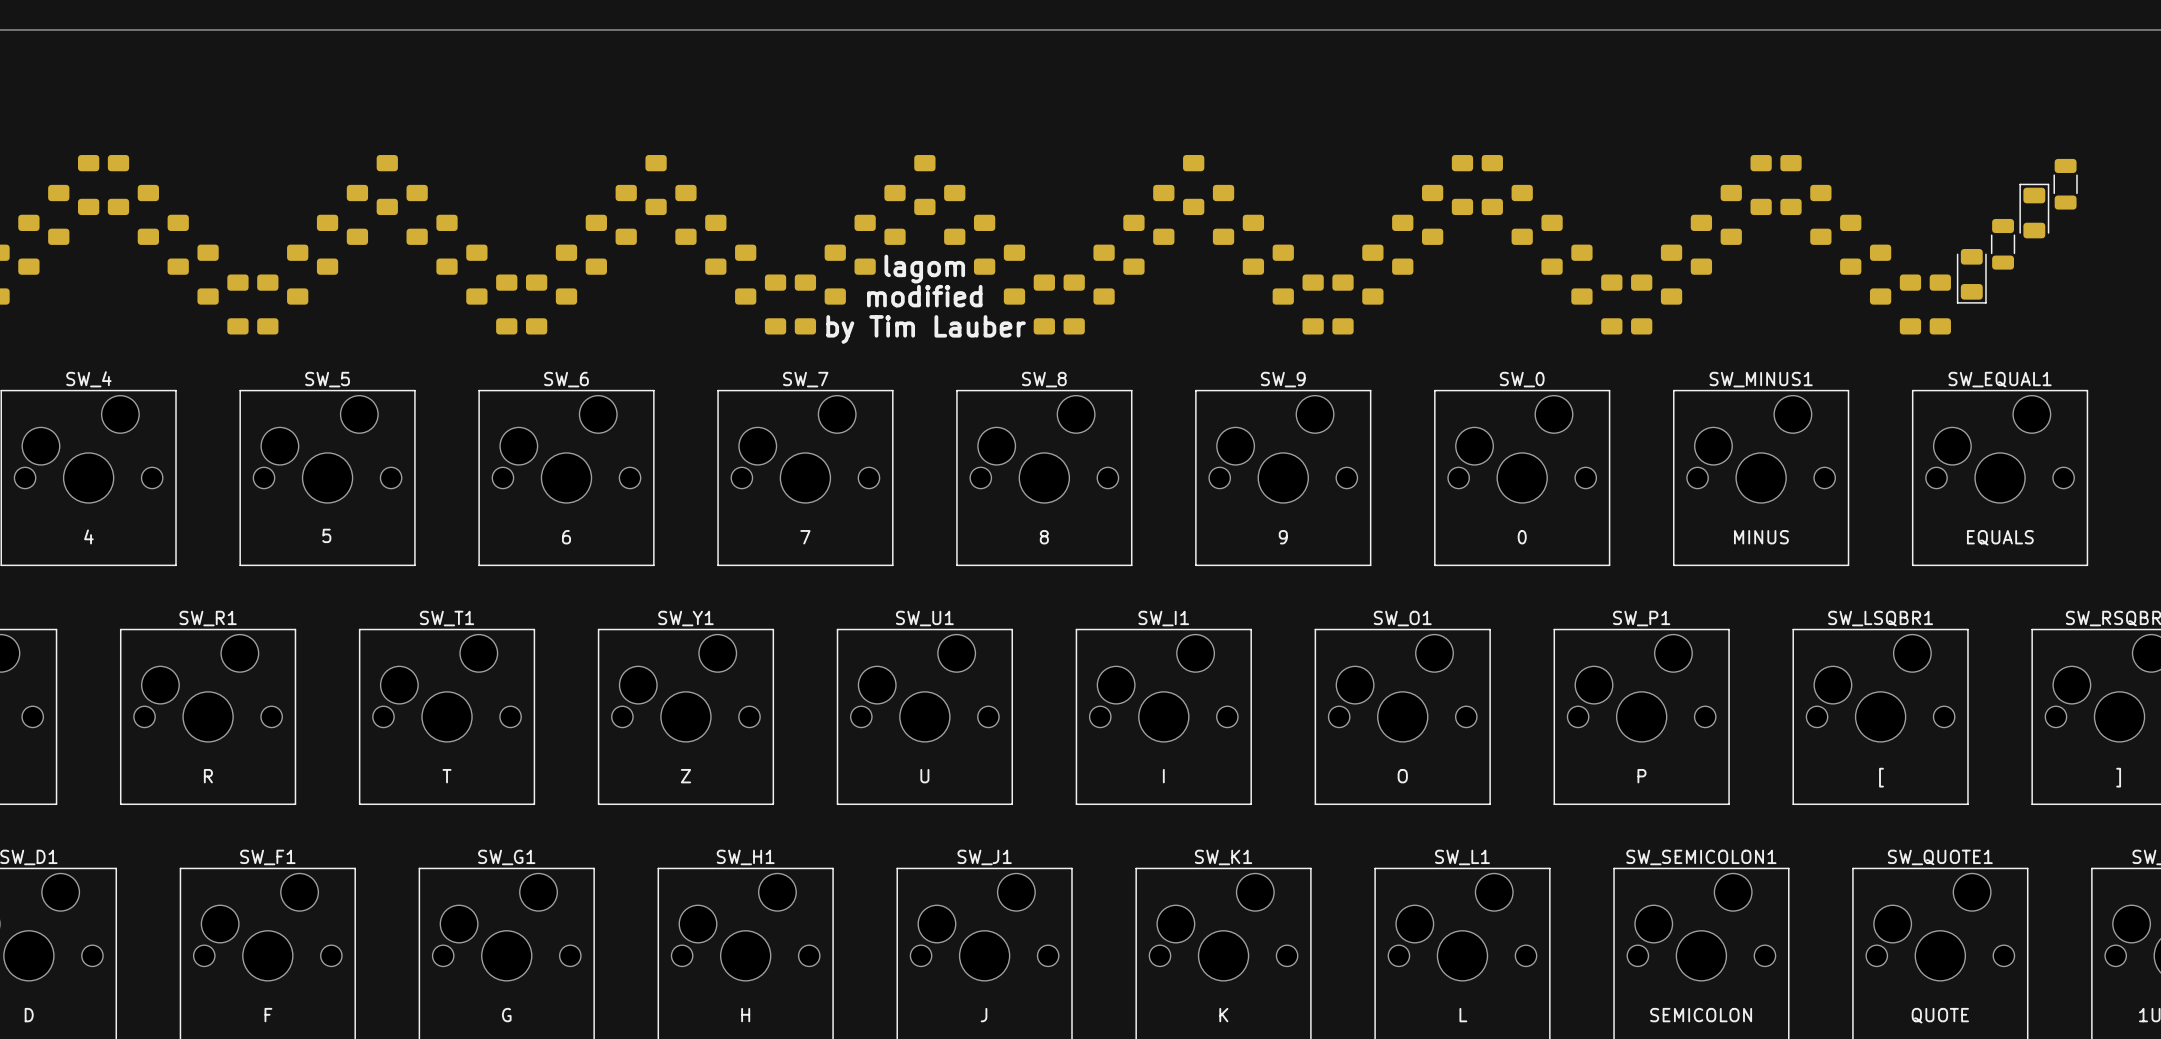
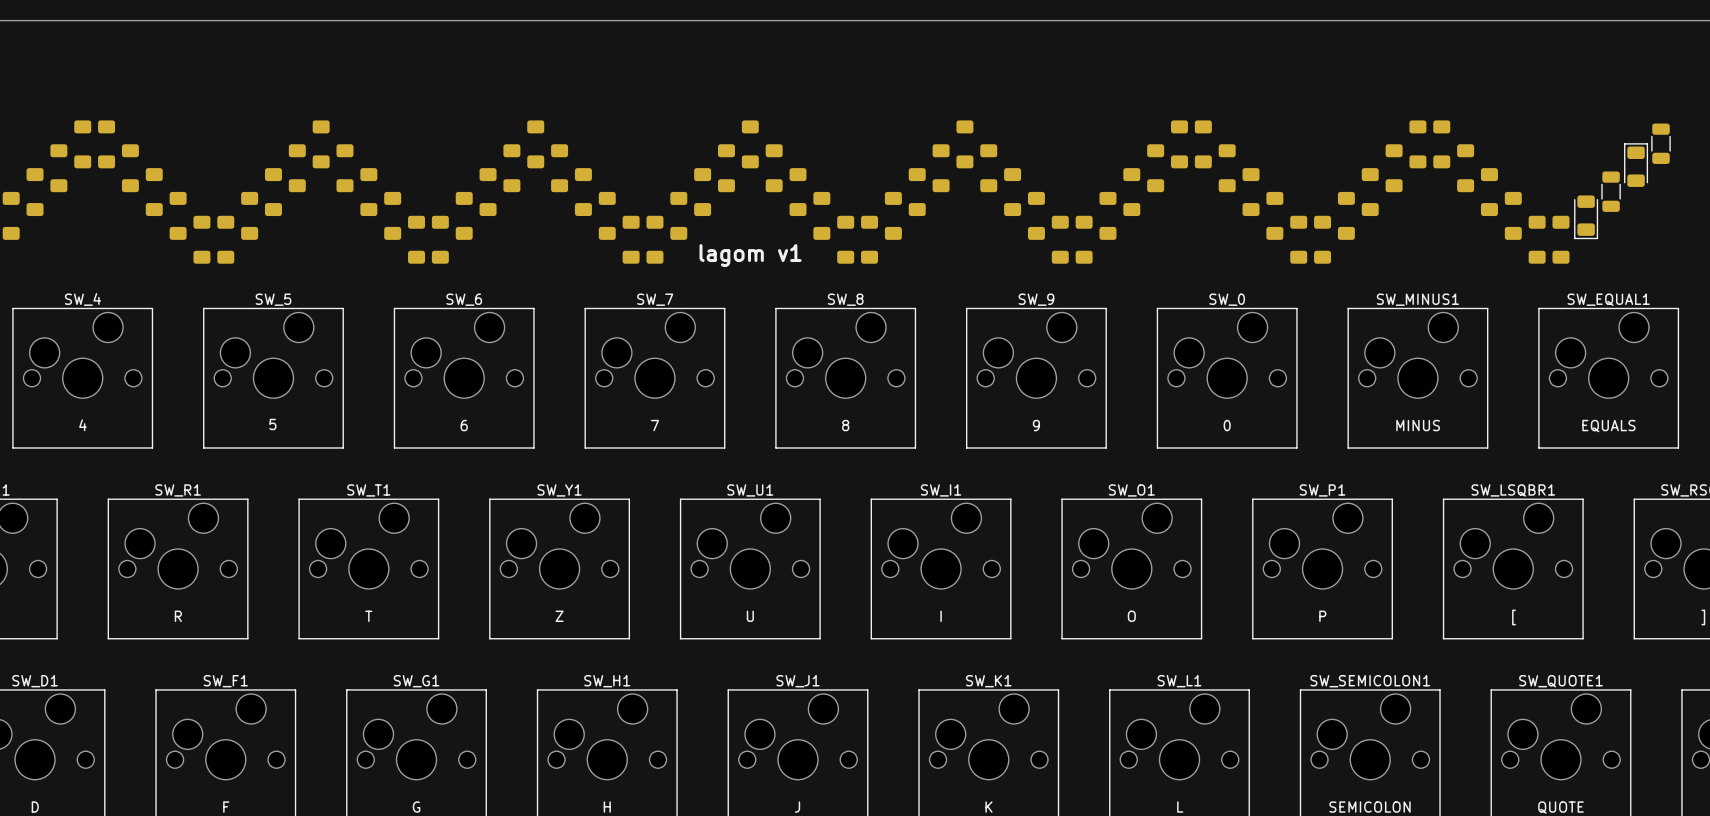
text: lagom (924, 269) -> none
text: modified (924, 296) -> none
text: by Tim Lauber (926, 329) -> lagom v1 (750, 255)

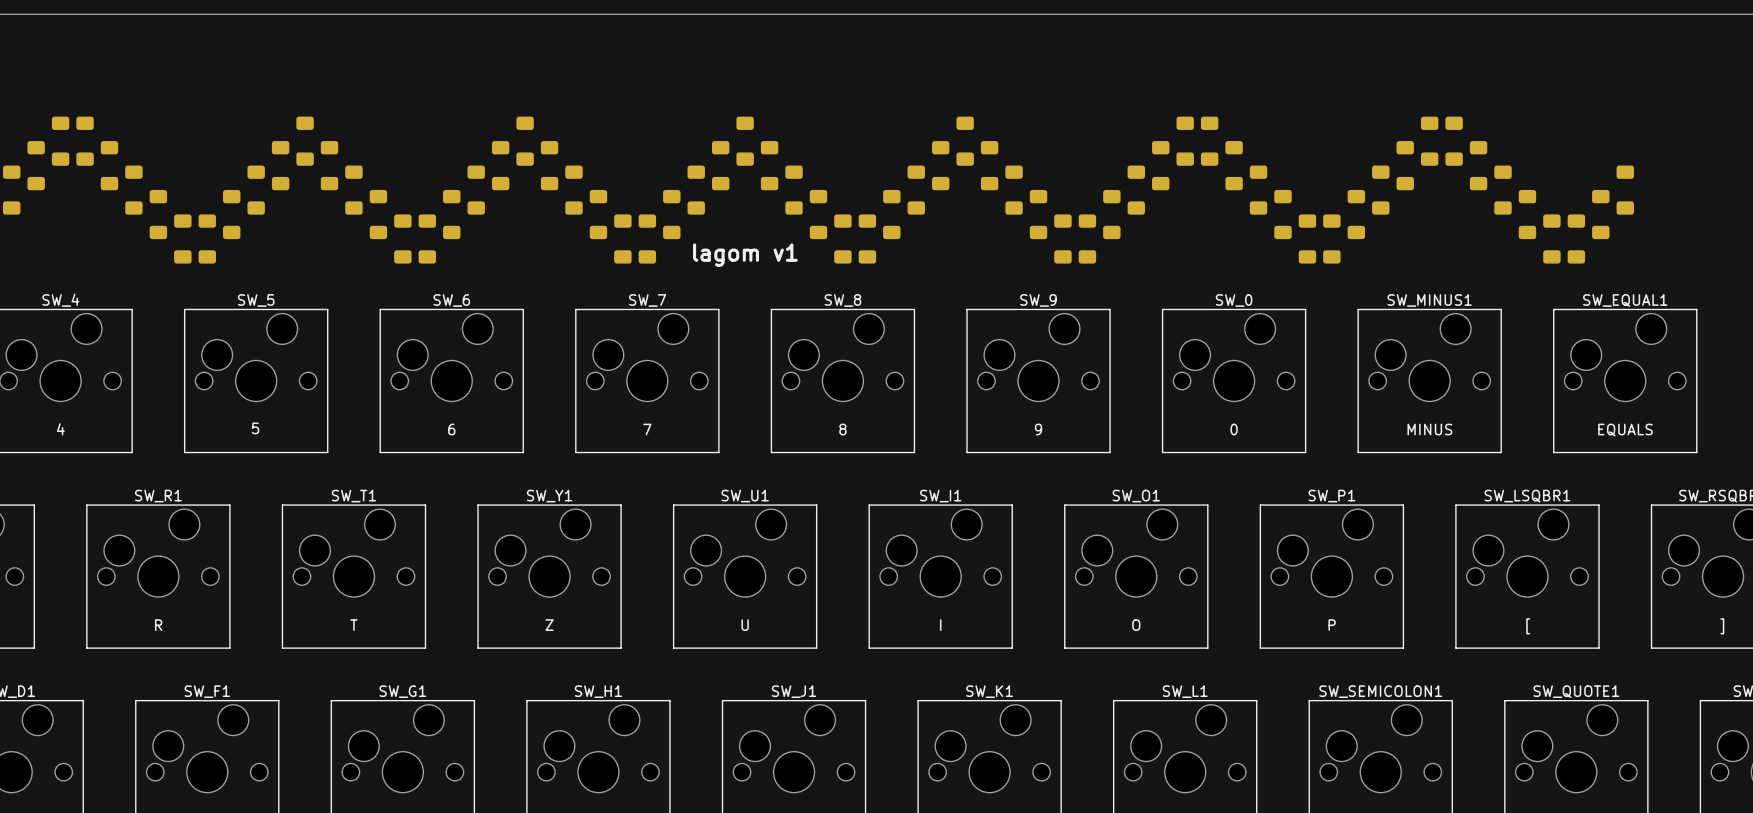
part: (1661, 143) -> none
part: (1636, 165) -> none
part footprint: [1601, 171, 1621, 212] -> [1616, 165, 1634, 215]
part footprint: [1574, 195, 1599, 240] -> [1592, 189, 1610, 240]

